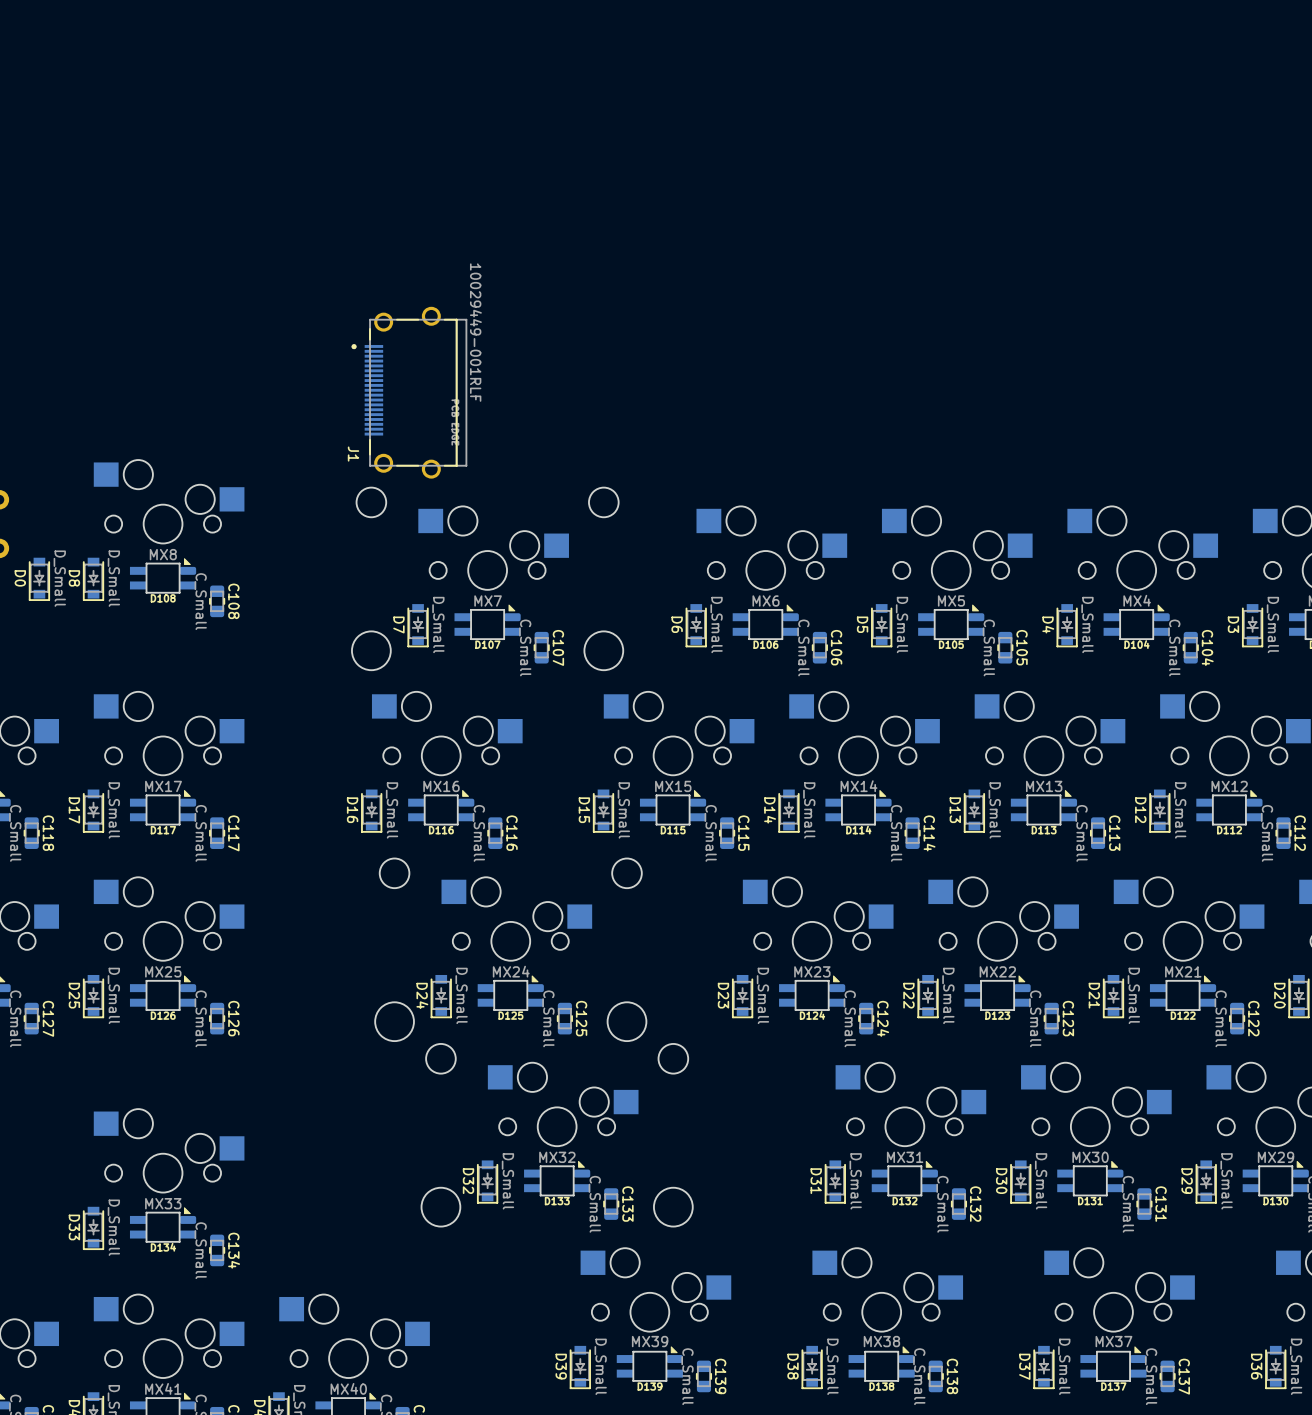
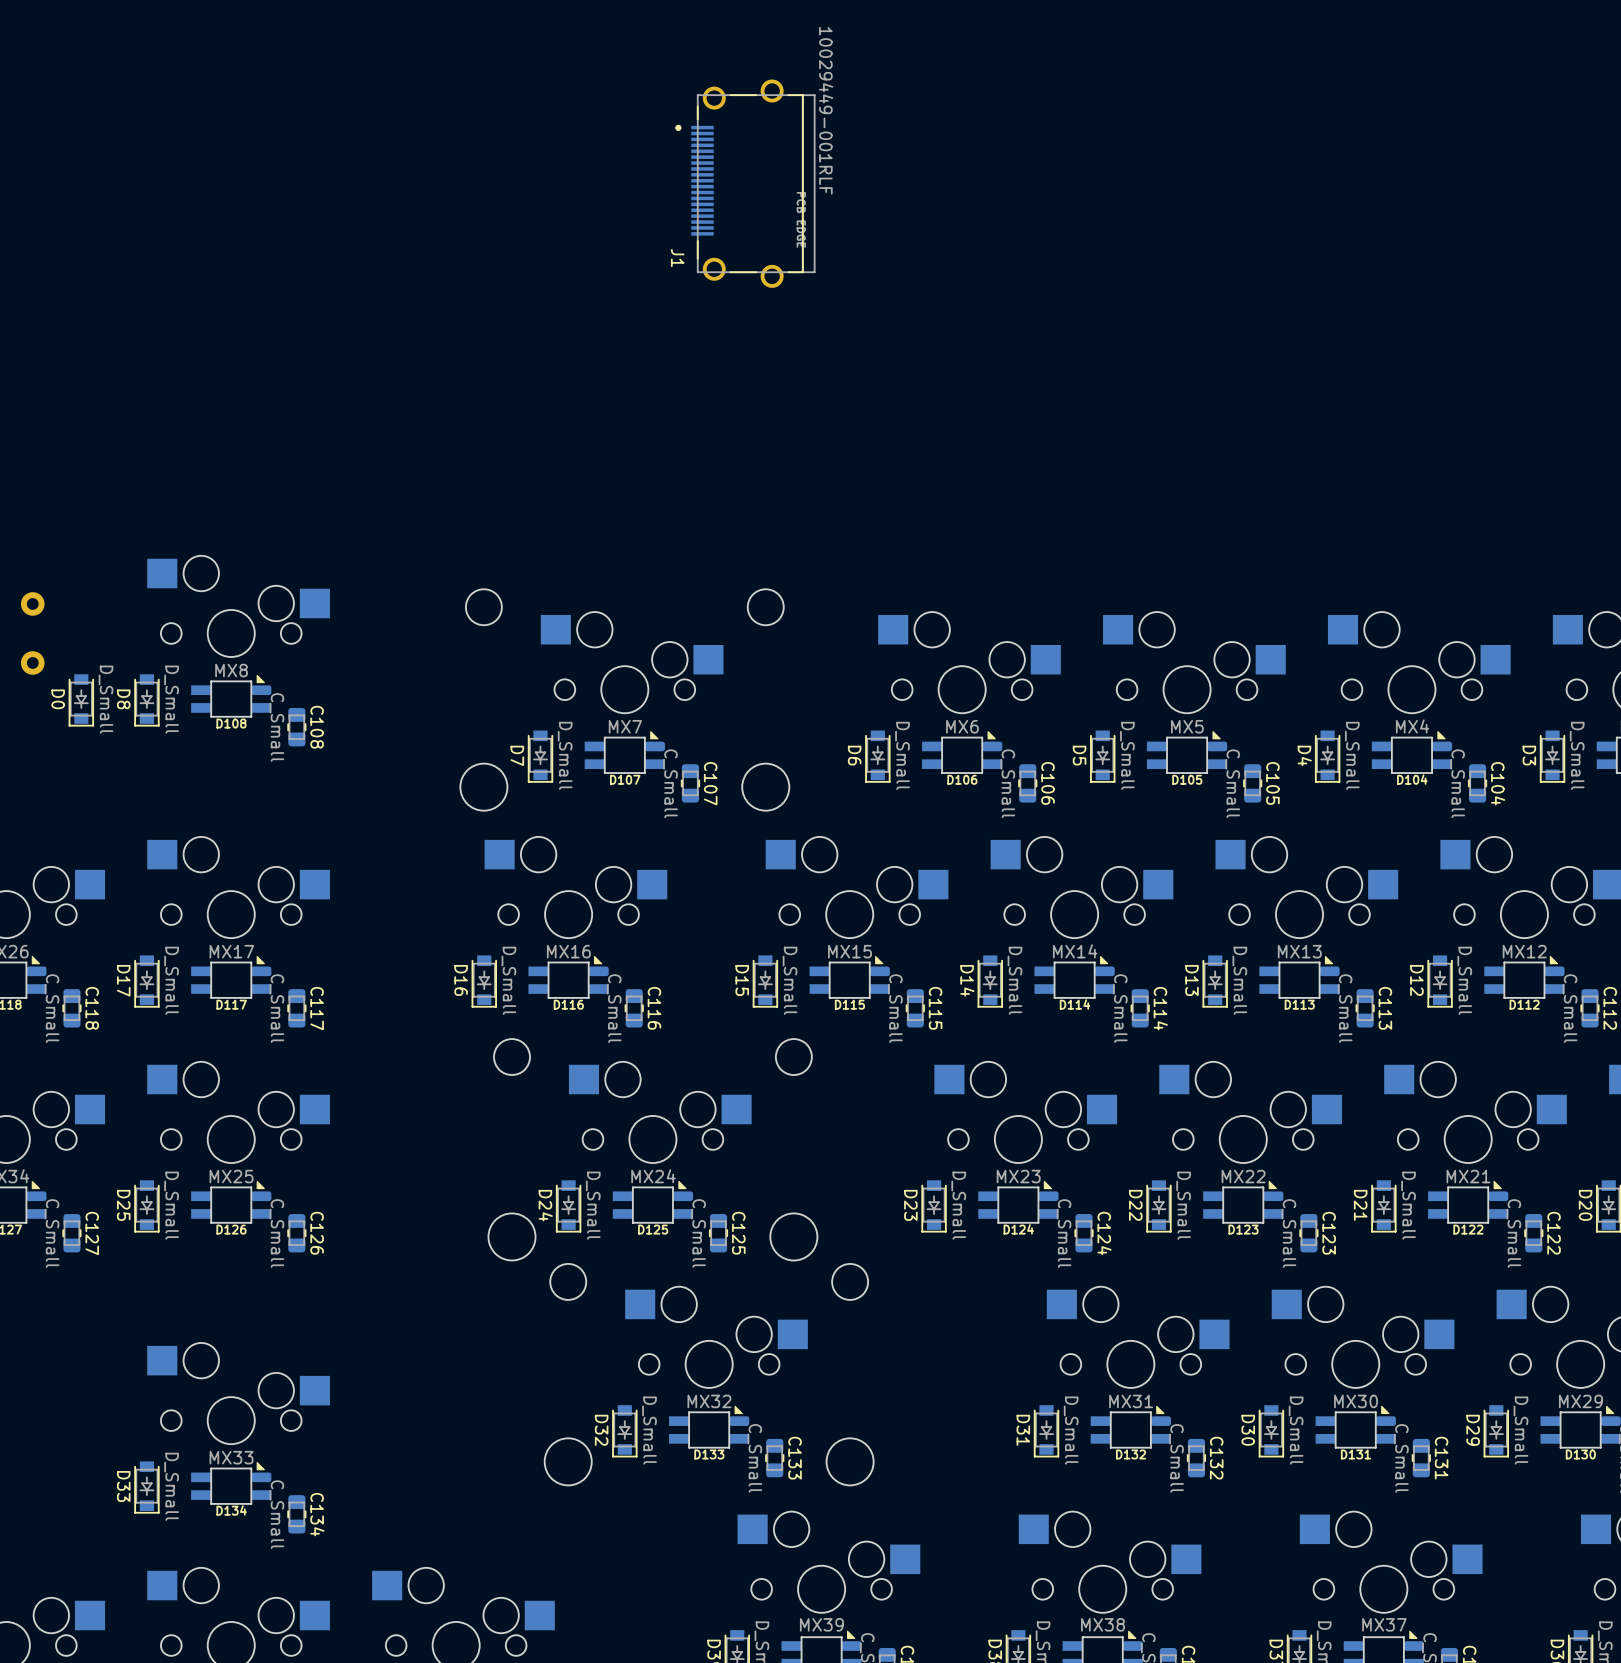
J1 position: (409, 392) -> (745, 183)

